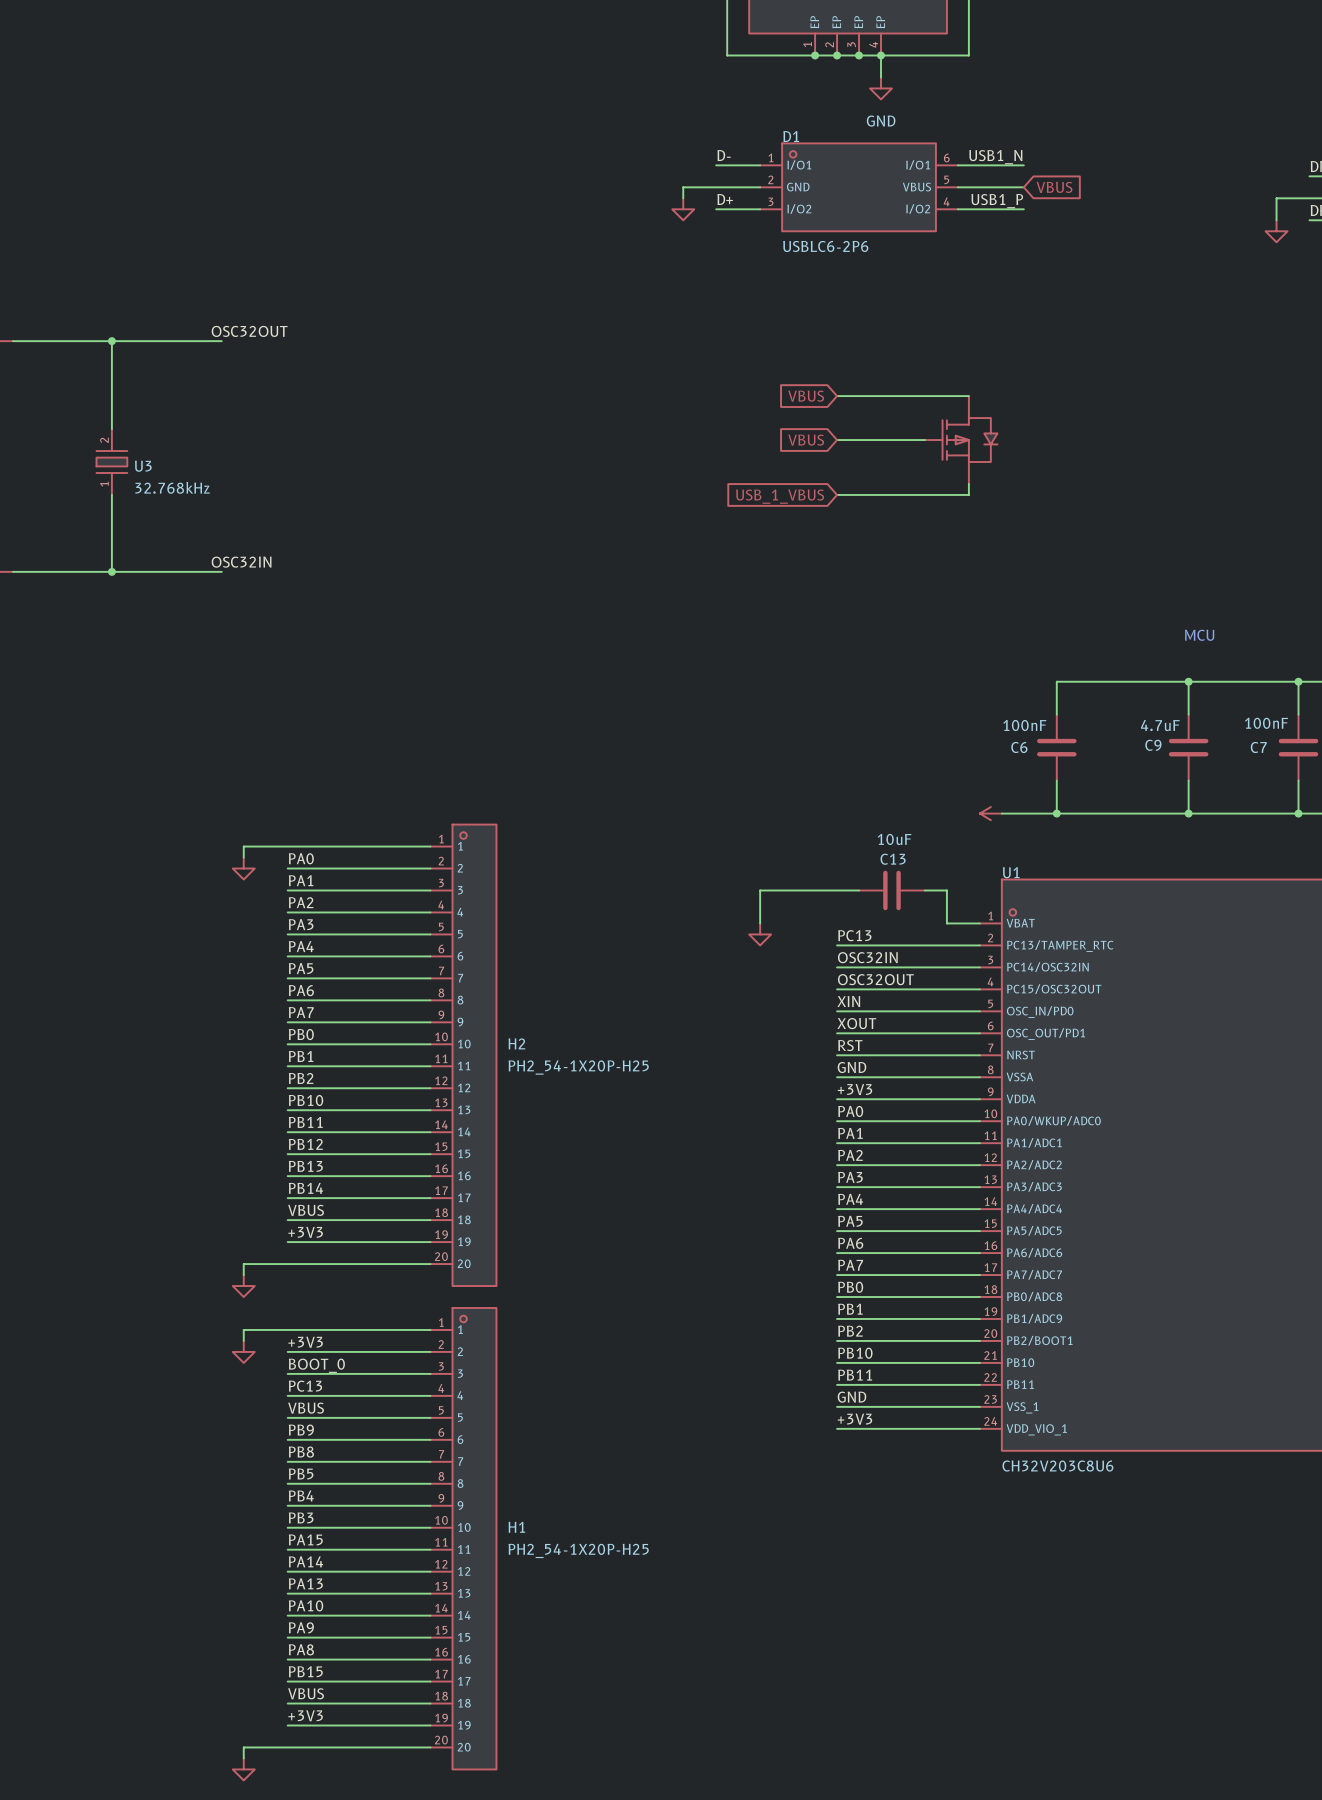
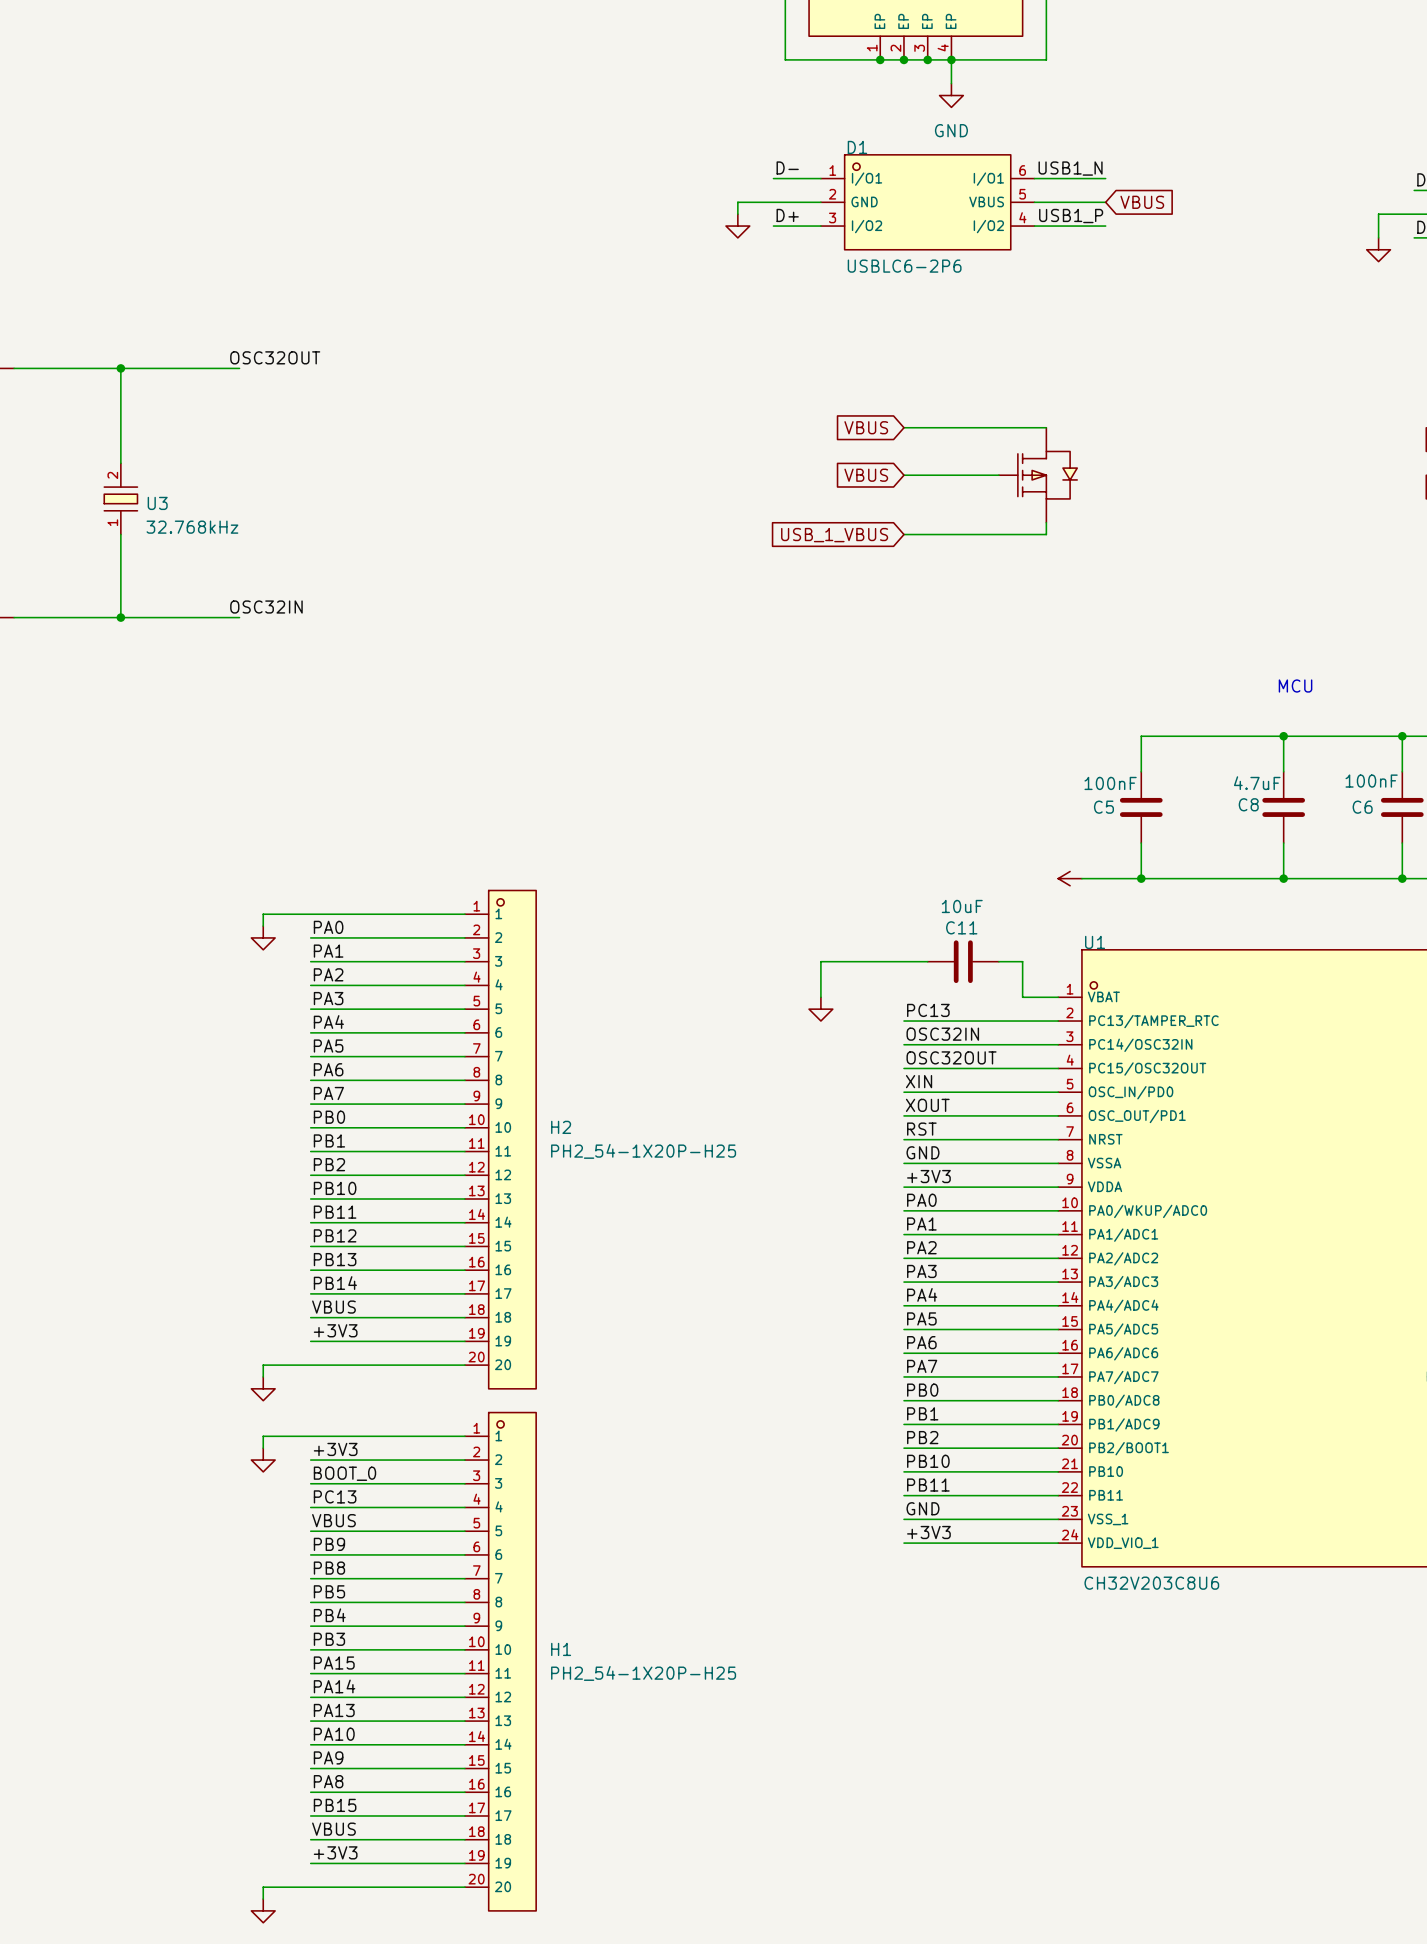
C9 name: C9 (1153, 745) -> C8 (1248, 804)
C6 name: C6 (1019, 747) -> C5 (1103, 807)
C7 name: C7 (1258, 747) -> C6 (1362, 807)
C13 name: C13 (893, 859) -> C11 (961, 927)

